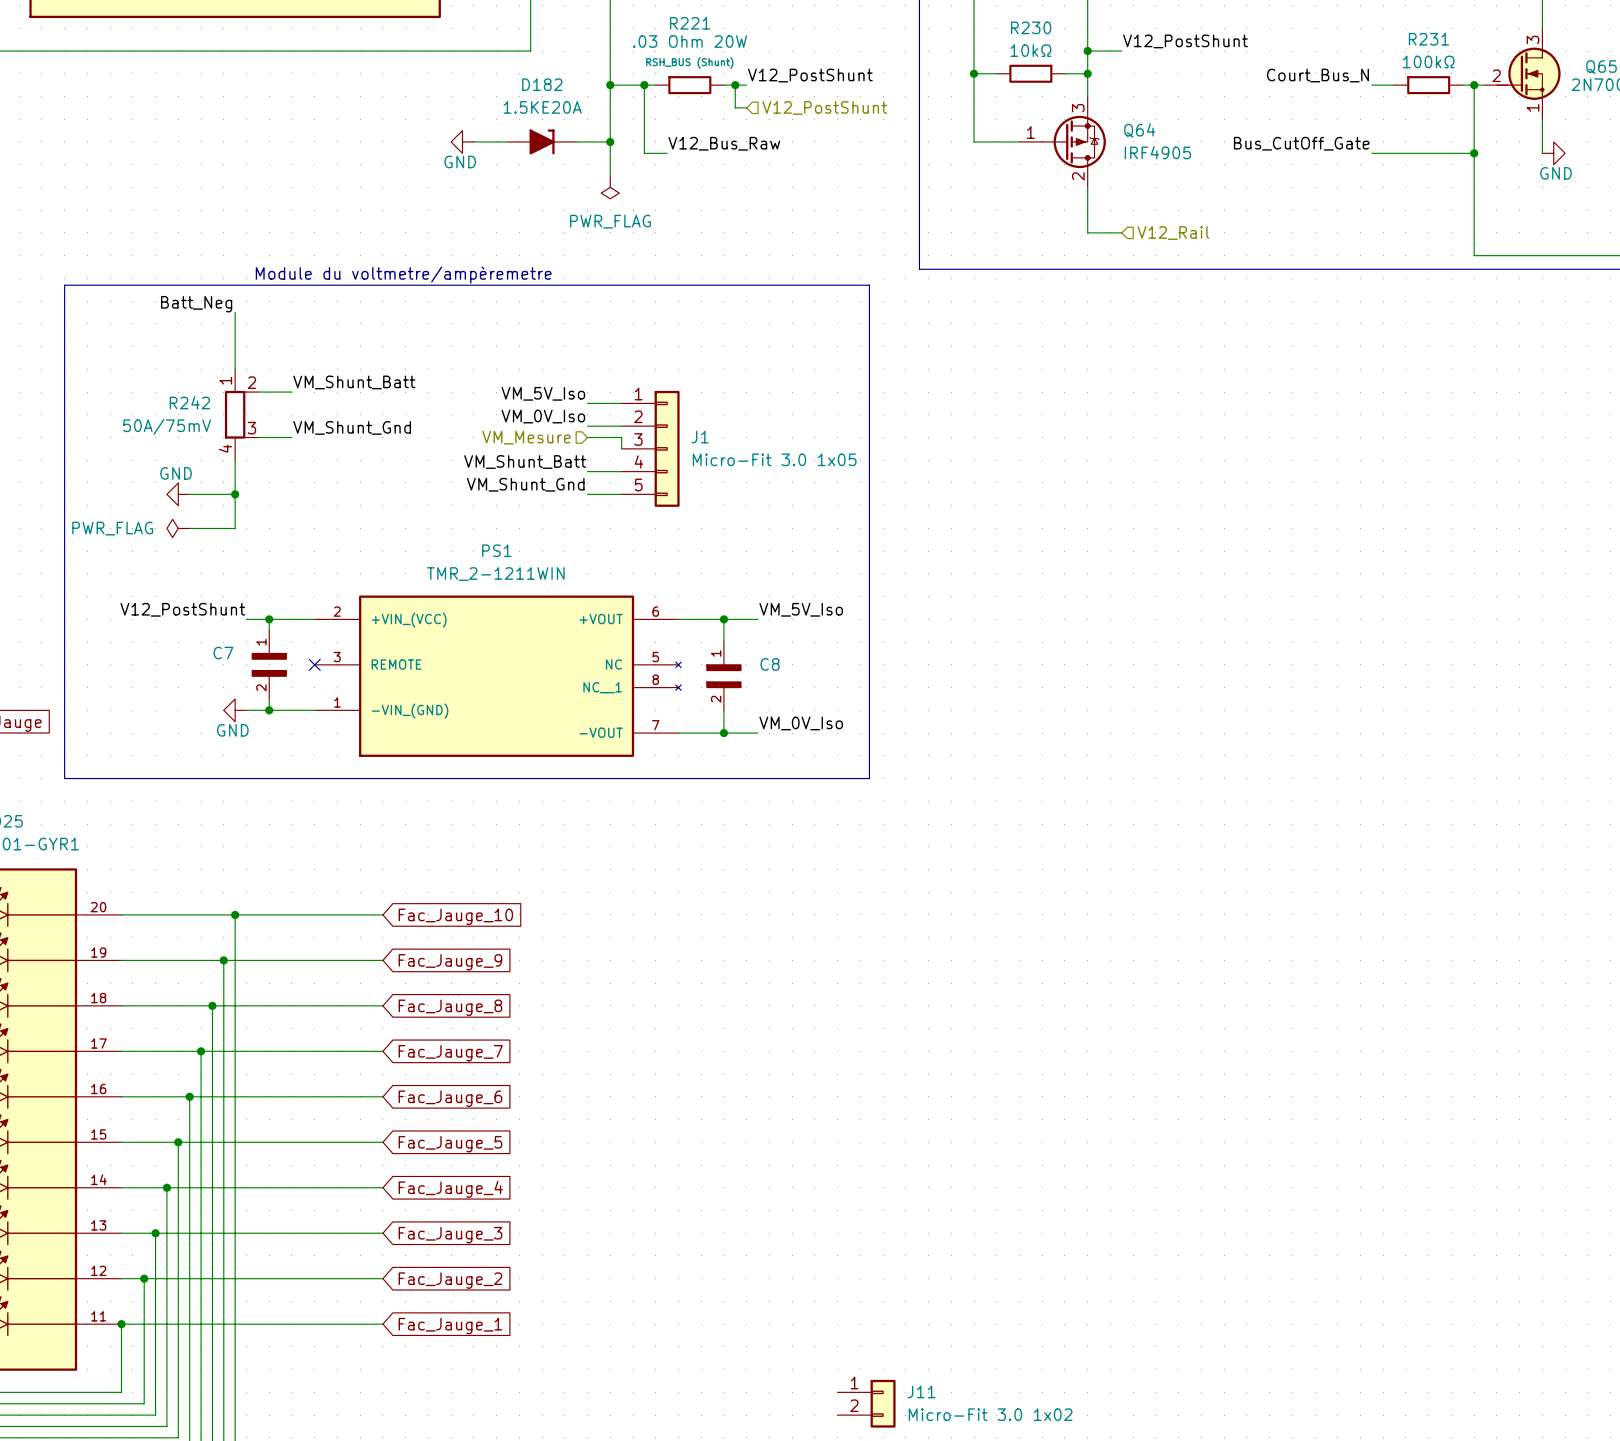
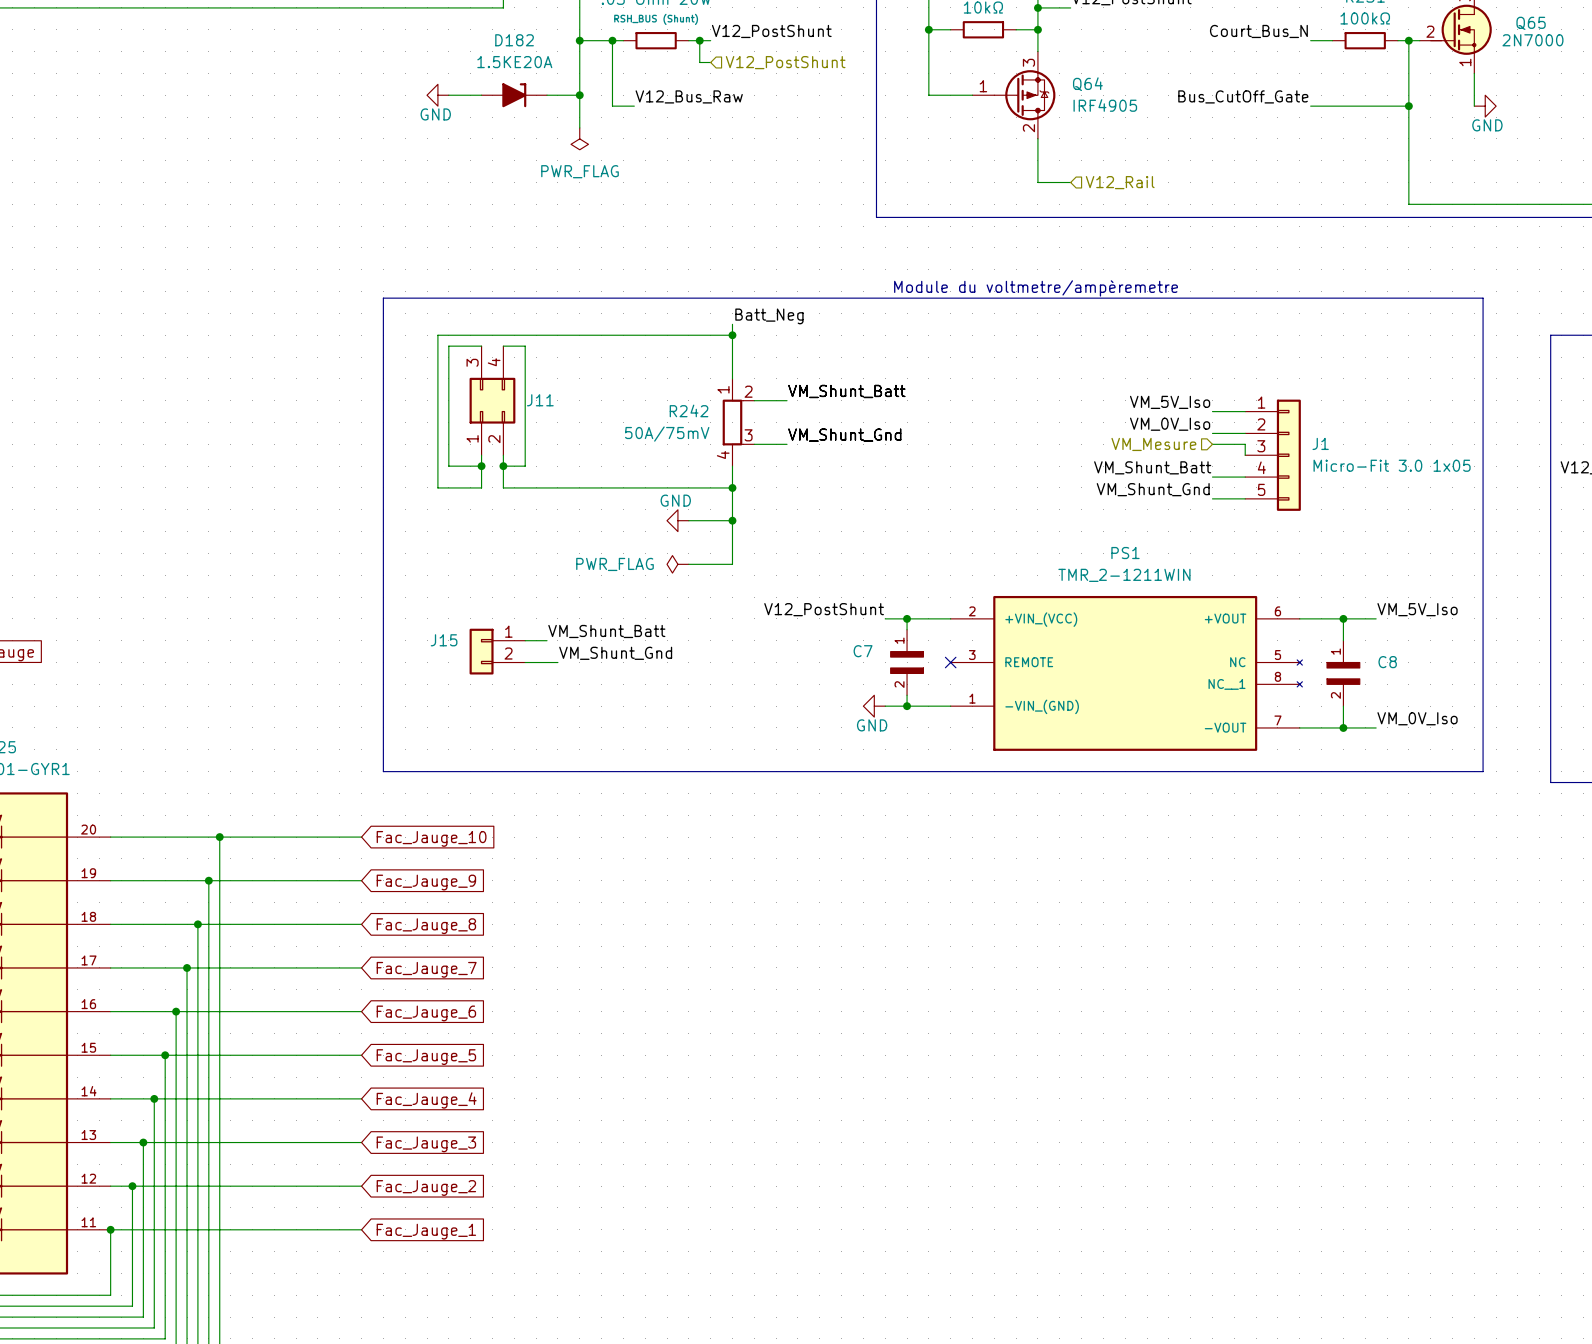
text: Module du voltmetre/ampèremetre (403, 275) -> none
line: (64, 285) (869, 285) (869, 778) (64, 778) (64, 285) -> none
label: Batt_Neg (196, 304) -> none
wire: (235, 312) (235, 369) -> none
text: none -> Module du voltmetre/ampèremetre (1036, 288)
line: none -> (383, 298) (1483, 298) (1483, 771) (383, 771) (383, 298)
label: none -> Batt_Neg (769, 316)
wire: none -> (732, 324) (732, 378)
label: VM_Shunt_Batt (354, 382) -> none
wire: (257, 392) (291, 392) -> none
wire: none -> (732, 335) (437, 335) (437, 487) (481, 487) (481, 455)
junction: none -> (732, 335)
label: VM_5V_Iso (543, 393) -> none
wire: none -> (481, 346) (448, 346) (448, 466) (481, 466)
wire: none -> (503, 346) (525, 346) (525, 466) (503, 466)
wire: (587, 403) (621, 403) -> none
R242 position: (241, 414) -> (738, 422)
label: VM_0V_Iso (543, 416) -> none
wire: (587, 426) (621, 426) -> (754, 400) (787, 400)
label: VM_Shunt_Gnd (352, 427) -> none
wire: (257, 437) (291, 437) -> none
hierarchical label: VM_Mesure (526, 437) -> none
wire: (587, 437) (621, 437) (621, 448) -> none
J1 position: (650, 448) -> (1273, 455)
label: none -> VM_Shunt_Batt (846, 391)
wire: (235, 460) (235, 528) (189, 528) -> none
label: VM_Shunt_Batt (525, 462) -> none
label: none -> VM_5V_Iso (1170, 402)
wire: (587, 471) (621, 471) -> (754, 444) (787, 444)
wire: none -> (1212, 411) (1245, 411)
label: VM_Shunt_Gnd (525, 484) -> none
label: none -> VM_0V_Iso (1170, 424)
power symbol: GND (178, 494) -> none
wire: (189, 494) (235, 494) -> none
junction: (235, 494) -> none
wire: (587, 494) (621, 494) -> none
wire: none -> (1212, 433) (1245, 433)
label: none -> VM_Shunt_Gnd (844, 435)
hierarchical label: none -> VM_Mesure (1153, 444)
wire: none -> (1212, 444) (1245, 444) (1245, 455)
wire: none -> (503, 455) (503, 487) (732, 487)
power symbol: PWR_FLAG (178, 528) -> none
junction: none -> (481, 466)
junction: none -> (503, 466)
wire: none -> (732, 466) (732, 564) (688, 564)
label: none -> VM_Shunt_Batt (1152, 467)
wire: none -> (1212, 477) (1245, 477)
junction: none -> (732, 487)
label: none -> VM_Shunt_Gnd (1153, 489)
wire: none -> (1212, 498) (1245, 498)
power symbol: none -> GND (677, 520)
wire: none -> (688, 520) (732, 520)
junction: none -> (732, 520)
label: V12_PostShunt (182, 609) -> none
label: VM_5V_Iso (801, 609) -> none
wire: (246, 619) (314, 619) -> none
wire: (269, 619) (269, 630) -> none
junction: (269, 619) -> none
wire: (678, 619) (758, 619) -> none
wire: (723, 619) (723, 642) -> none
junction: (723, 619) -> none
power symbol: none -> PWR_FLAG (677, 564)
C7 position: (269, 664) -> (907, 662)
no-connect mark: (314, 664) -> none
PS1 position: (497, 676) -> (1126, 673)
C8 position: (723, 676) -> (1343, 673)
label: none -> V12_PostShunt (824, 609)
label: none -> VM_5V_Iso (1417, 609)
wire: none -> (885, 618) (950, 618)
wire: none -> (907, 618) (907, 629)
junction: none -> (907, 618)
wire: none -> (1299, 618) (1376, 618)
wire: none -> (1343, 618) (1343, 640)
junction: none -> (1343, 618)
wire: (269, 698) (269, 710) -> none
label: none -> VM_Shunt_Batt (606, 631)
power symbol: GND (235, 710) -> none
wire: (246, 710) (314, 710) -> none
junction: (269, 710) -> none
wire: (723, 710) (723, 733) -> none
J15: none -> (497, 651)
label: none -> VM_Shunt_Gnd (615, 653)
label: VM_0V_Iso (801, 723) -> none
wire: (678, 733) (758, 733) -> none
junction: (723, 733) -> none
no-connect mark: none -> (950, 662)
wire: none -> (907, 695) (907, 706)
power symbol: none -> GND (874, 706)
wire: none -> (885, 706) (950, 706)
junction: none -> (907, 706)
wire: none -> (1343, 706) (1343, 727)
label: none -> VM_0V_Iso (1417, 718)
wire: none -> (1299, 727) (1376, 727)
junction: none -> (1343, 727)
J11 symbol: [837, 1379, 896, 1428] -> [469, 346, 516, 456]
J11 value: Micro-Fit 3.0 1x02 (990, 1414) -> none

